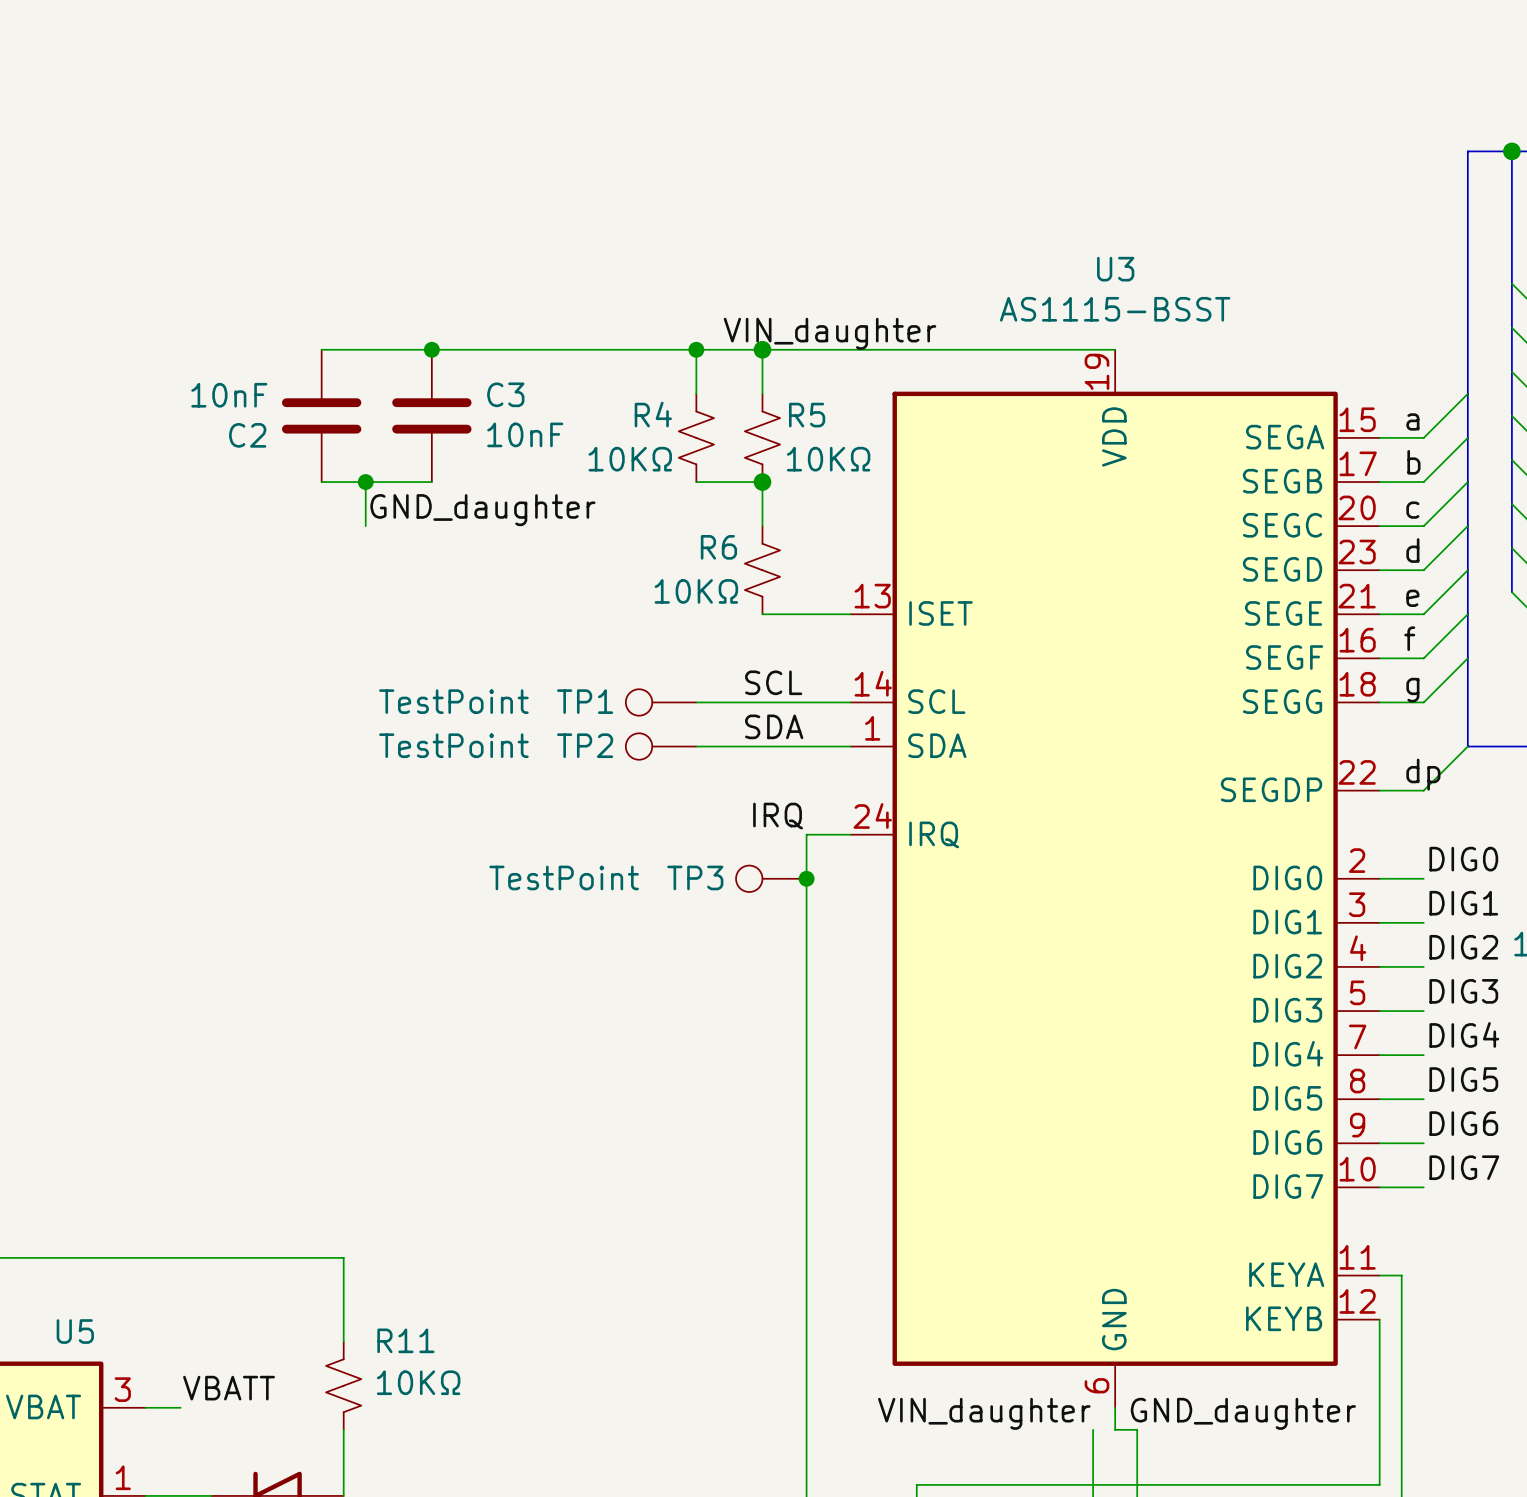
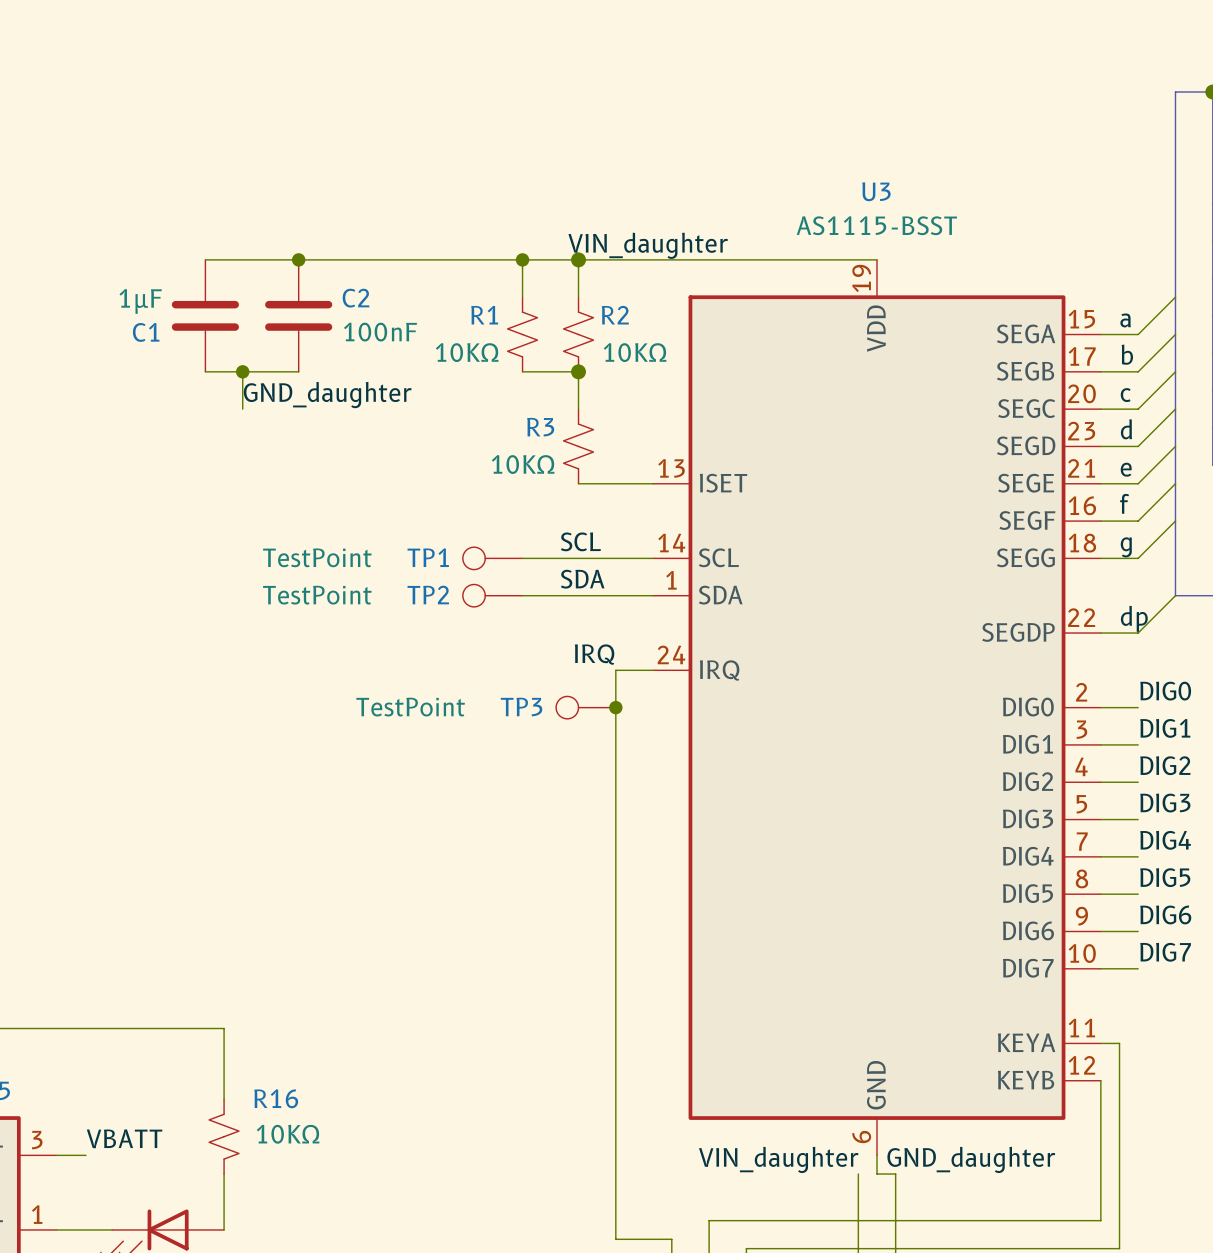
C3 name: C3 (505, 394) -> C2 (355, 298)
C2 value: 10nF (229, 395) -> 1µF (140, 301)
R4 name: R4 (653, 414) -> R1 (484, 315)
R5 name: R5 (807, 415) -> R2 (615, 315)
C3 value: 10nF (525, 434) -> 100nF (380, 332)
C2 name: C2 (247, 435) -> C1 (146, 332)
R6 name: R6 (718, 547) -> R3 (540, 427)
R11 name: R11 (405, 1340) -> R16 (276, 1098)

